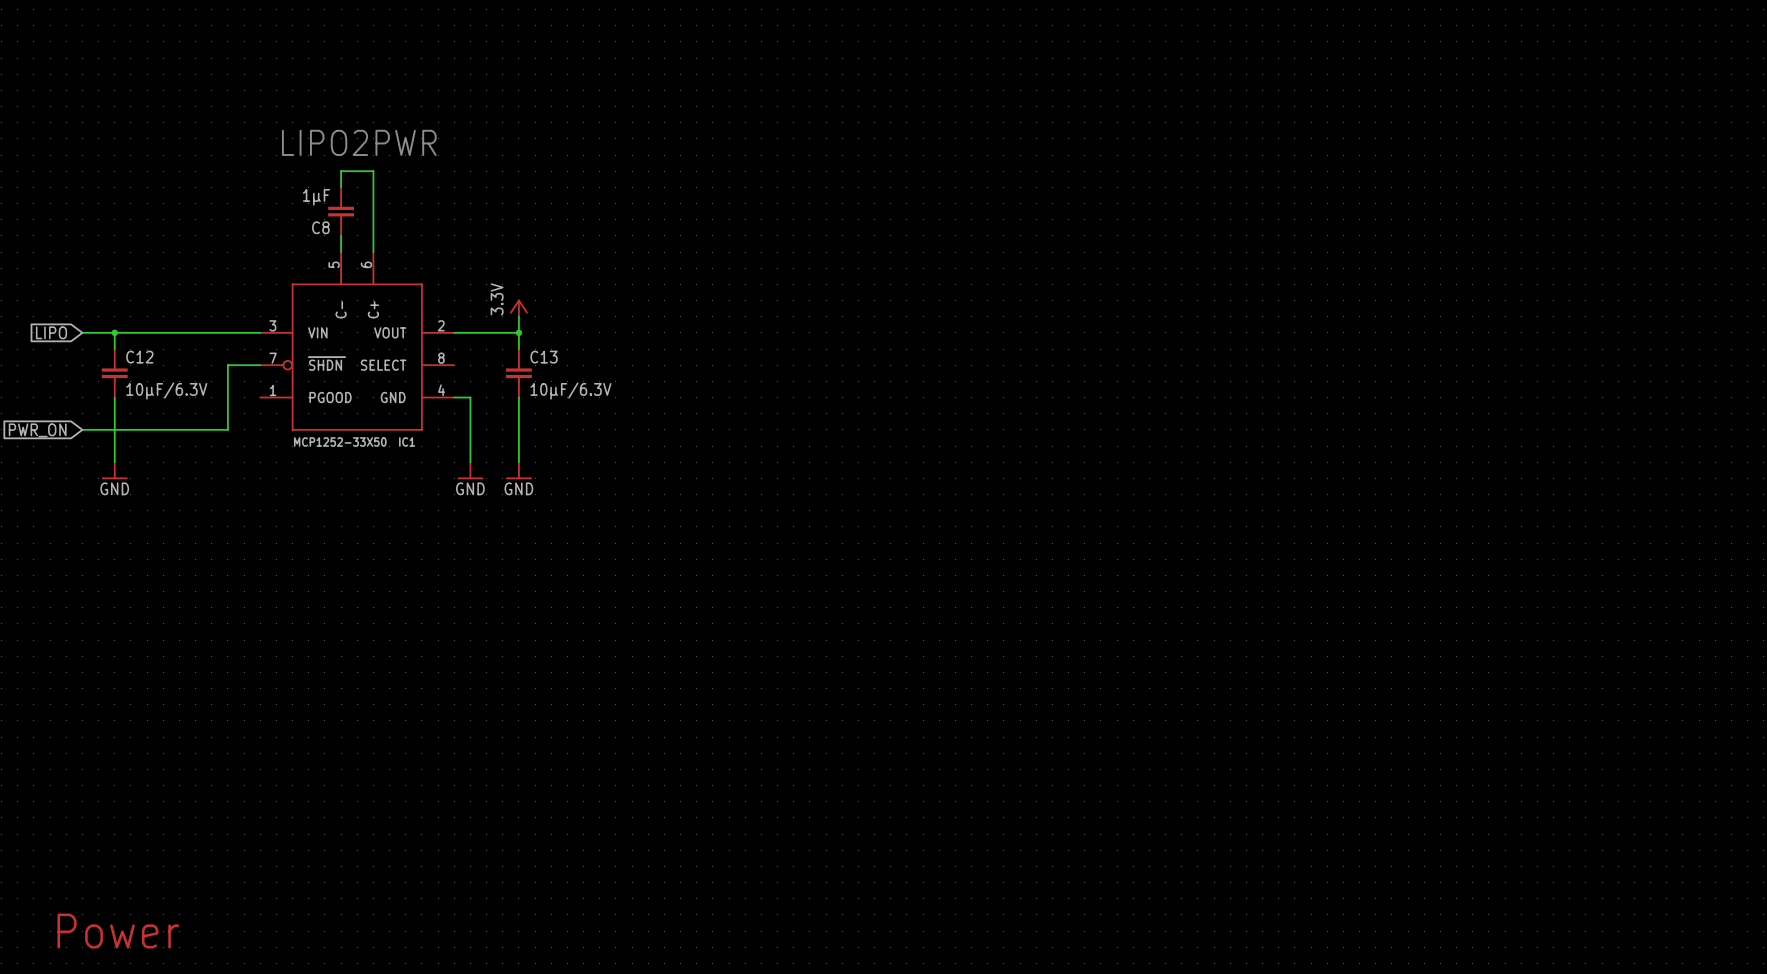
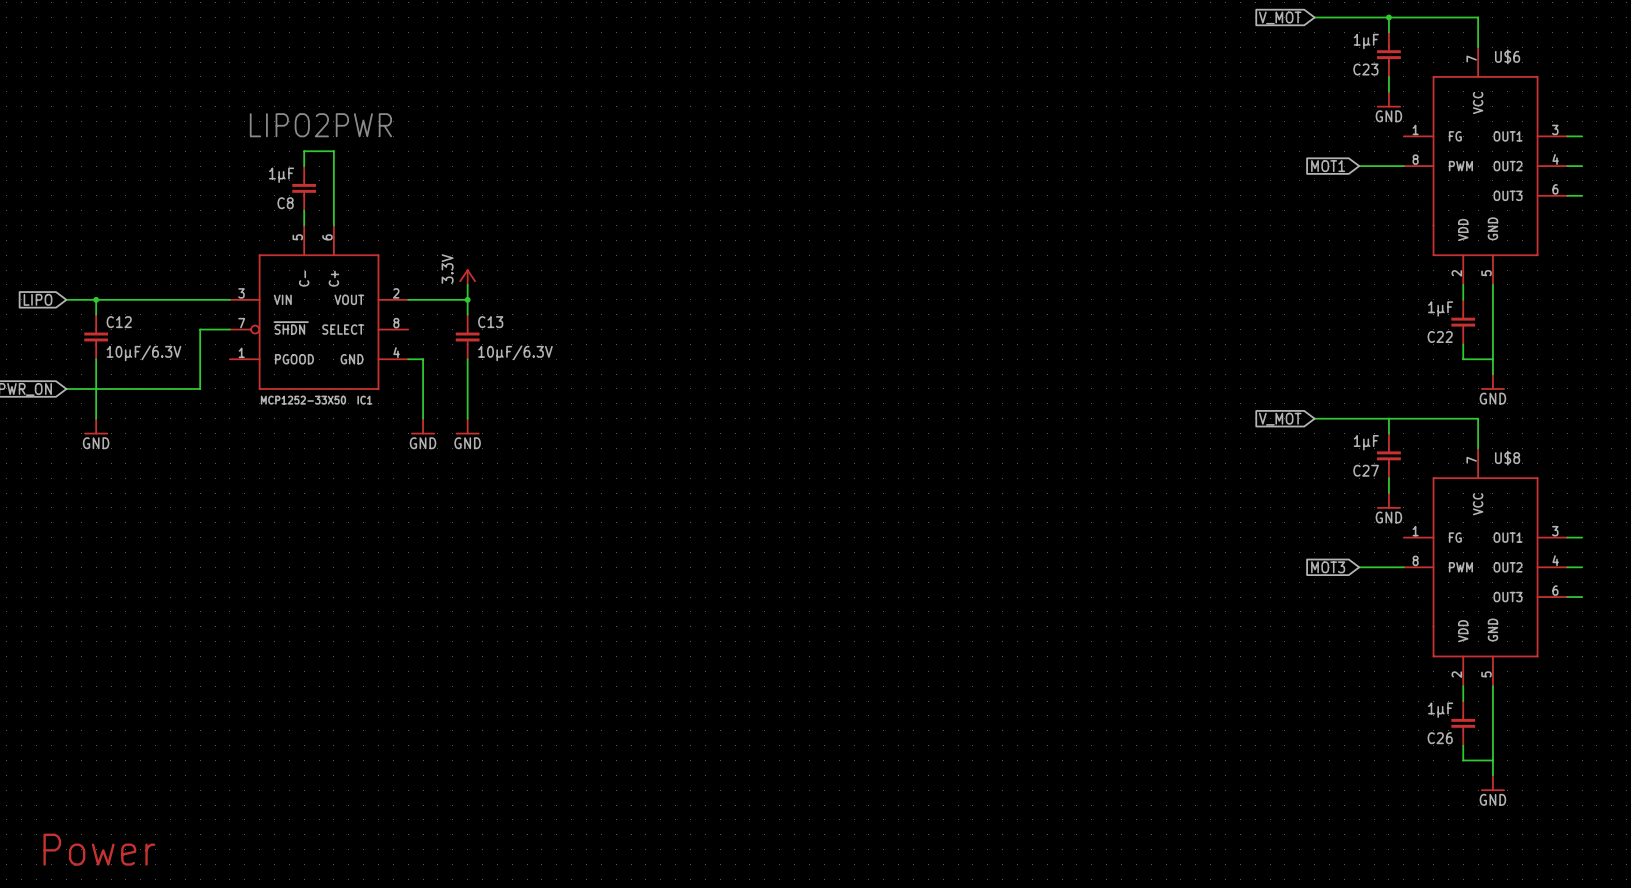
wire: none -> (1314, 17) (1478, 17) (1478, 47)
wire: none -> (1388, 17) (1388, 32)
junction: none -> (1388, 17)
global label: none -> V_MOT (1280, 17)
C23: none -> 1µF (1388, 54)
wire: none -> (1388, 76) (1388, 91)
power symbol: none -> GND (1388, 99)
wire: none -> (1567, 136) (1582, 136)
global label: none -> MOT1 (1328, 166)
wire: none -> (1359, 166) (1403, 166)
U$6: none -> (1485, 166)
wire: none -> (1567, 166) (1582, 166)
wire: none -> (1567, 195) (1582, 195)
wire: none -> (1463, 284) (1463, 299)
wire: none -> (1492, 284) (1492, 374)
C22: none -> 1µF (1463, 322)
wire: none -> (1463, 344) (1463, 359) (1492, 359)
power symbol: none -> GND (1492, 381)
global label: none -> V_MOT (1280, 419)
wire: none -> (1314, 418) (1478, 418) (1478, 448)
wire: none -> (1388, 418) (1388, 433)
C27: none -> 1µF (1388, 455)
wire: none -> (1388, 478) (1388, 493)
power symbol: none -> GND (1388, 500)
wire: none -> (1567, 537) (1582, 537)
global label: none -> MOT3 (1328, 567)
wire: none -> (1359, 567) (1403, 567)
U$8: none -> (1485, 567)
wire: none -> (1567, 567) (1582, 567)
wire: none -> (1567, 597) (1582, 597)
wire: none -> (1463, 686) (1463, 701)
wire: none -> (1492, 686) (1492, 775)
C26: none -> 1µF (1463, 723)
wire: none -> (1463, 745) (1463, 760) (1492, 760)
power symbol: none -> GND (1492, 783)

